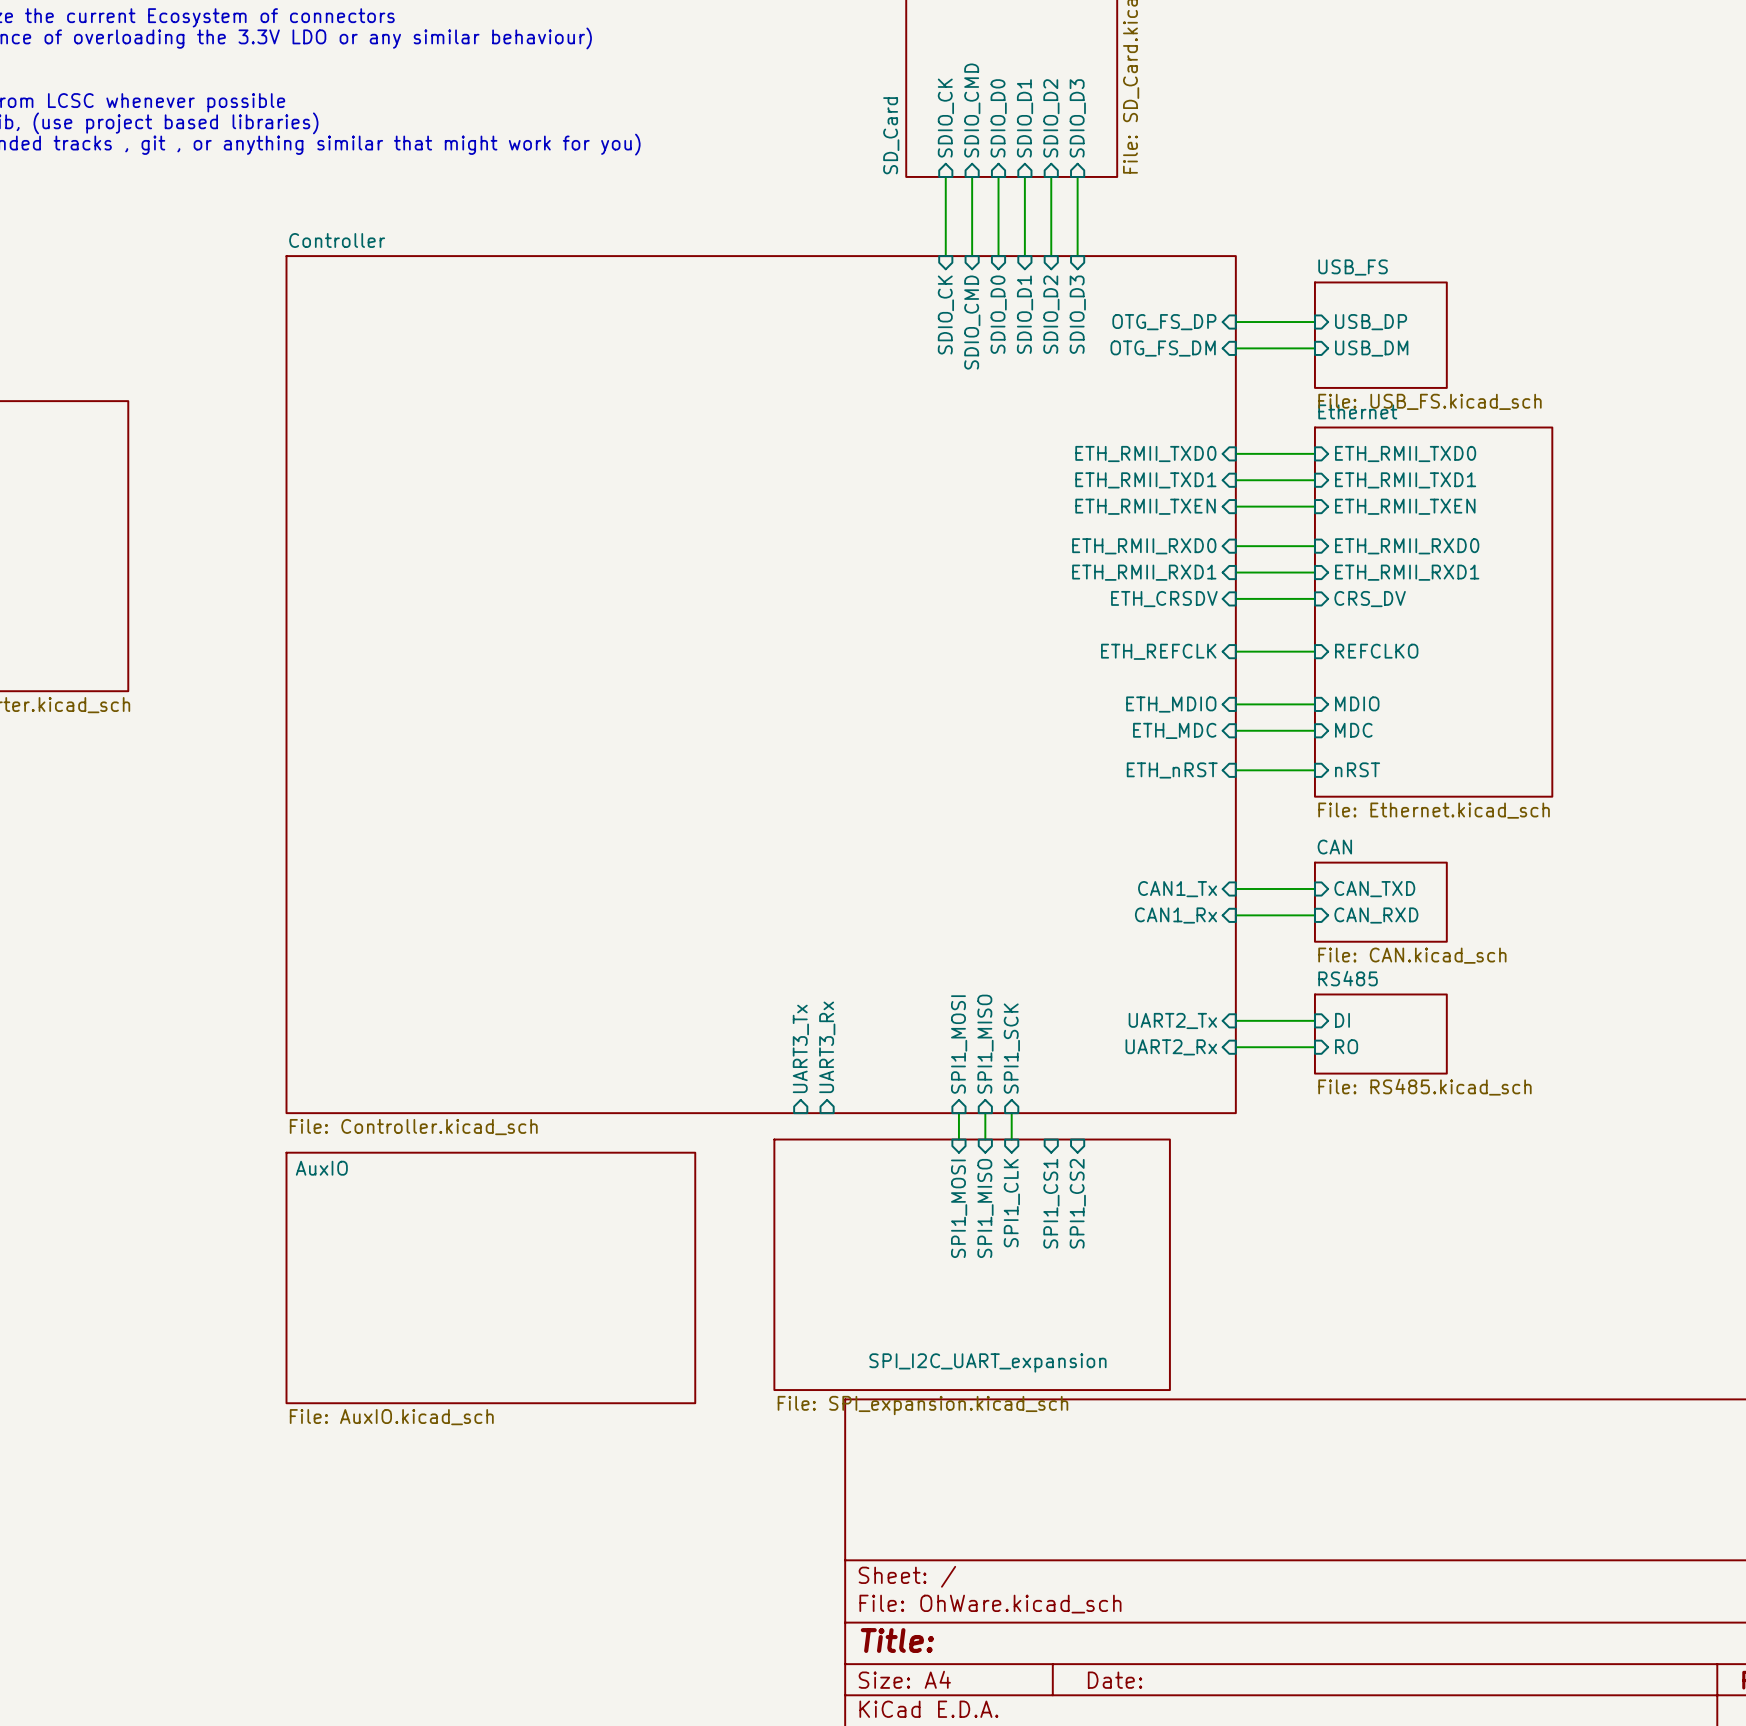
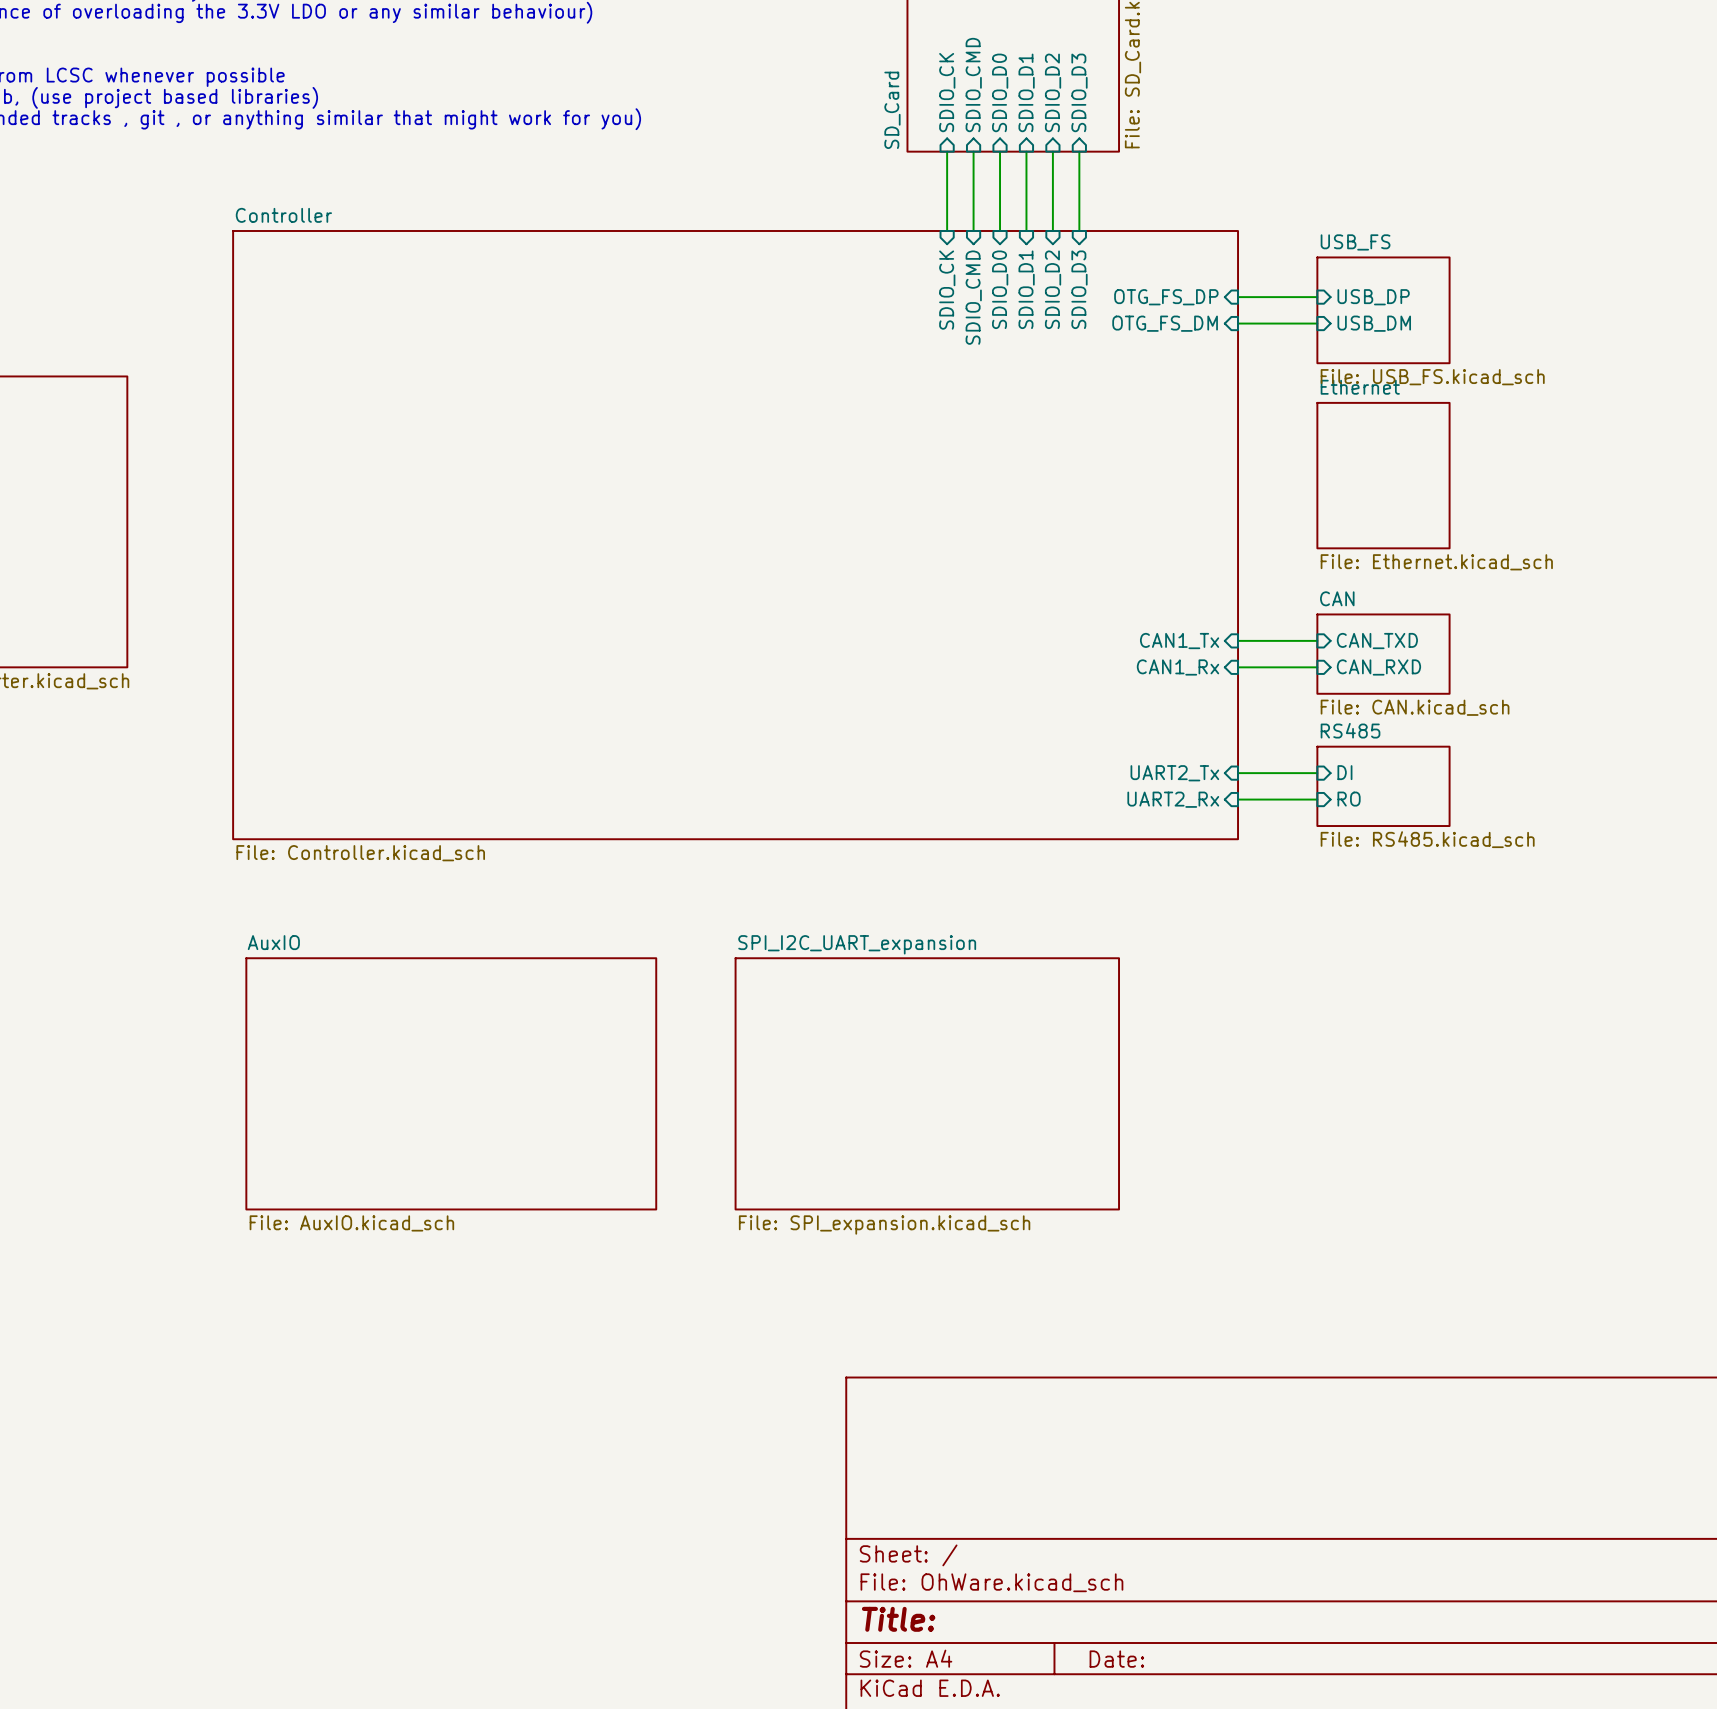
wire: (1235, 453) (1314, 453) -> none
sheet pin: ETH_RMII_TXD0 (1145, 454) -> none
sheet pin: ETH_RMII_TXD0 (1405, 454) -> none
sheet pin: ETH_RMII_TXD1 (1145, 480) -> none
wire: (1235, 480) (1314, 480) -> none
sheet pin: ETH_RMII_TXD1 (1405, 480) -> none
sheet Ethernet: none -> File: Ethernet.kicad_sch (1383, 475)
sheet pin: ETH_RMII_TXEN (1145, 506) -> none
wire: (1235, 506) (1314, 506) -> none
sheet pin: ETH_RMII_TXEN (1405, 506) -> none
sheet pin: ETH_RMII_RXD0 (1144, 546) -> none
wire: (1235, 546) (1314, 546) -> none
sheet pin: ETH_RMII_RXD0 (1407, 546) -> none
sheet Controller: none -> File: Controller.kicad_sch (735, 535)
sheet pin: ETH_RMII_RXD1 (1144, 572) -> none
wire: (1235, 572) (1314, 572) -> (1238, 640) (1317, 640)
sheet pin: ETH_RMII_RXD1 (1407, 572) -> none
wire: (1235, 598) (1314, 598) -> (1238, 667) (1317, 667)
sheet pin: ETH_CRSDV (1164, 599) -> none
sheet pin: CRS_DV (1370, 599) -> none
sheet Ethernet: File: Ethernet.kicad_sch (1433, 612) -> none
sheet pin: ETH_REFCLK (1158, 651) -> none
wire: (1235, 651) (1314, 651) -> none
sheet pin: REFCLKO (1376, 651) -> none
sheet Controller: File: Controller.kicad_sch (761, 684) -> none
sheet pin: MDIO (1357, 703) -> none
sheet pin: ETH_MDIO (1171, 704) -> none
wire: (1235, 704) (1314, 704) -> (1238, 773) (1317, 773)
sheet pin: ETH_MDC (1174, 730) -> none
wire: (1235, 730) (1314, 730) -> (1238, 799) (1317, 799)
sheet pin: MDC (1353, 730) -> none
sheet pin: nRST (1357, 769) -> none
sheet pin: ETH_nRST (1172, 770) -> none
wire: (1235, 770) (1314, 770) -> none
wire: (1235, 888) (1314, 888) -> none
sheet pin position: CAN1_Tx (1177, 889) -> CAN1_Tx (1179, 641)
sheet pin position: CAN_TXD (1374, 889) -> CAN_TXD (1377, 641)
sheet CAN position: (1380, 902) -> (1383, 654)
sheet pin position: CAN1_Rx (1176, 915) -> CAN1_Rx (1178, 667)
wire: (1235, 915) (1314, 915) -> none
sheet pin position: CAN_RXD (1376, 915) -> CAN_RXD (1378, 667)
sheet pin position: UART2_Tx (1172, 1020) -> UART2_Tx (1174, 773)
wire: (1235, 1020) (1314, 1020) -> none
sheet pin position: DI (1342, 1020) -> DI (1344, 772)
sheet RS485 position: (1380, 1034) -> (1383, 786)
sheet pin: SPI1_MOSI (959, 1044) -> none
sheet pin: SPI1_MISO (985, 1044) -> none
sheet pin position: RO (1346, 1046) -> RO (1349, 799)
sheet pin: UART3_Rx (827, 1047) -> none
sheet pin position: UART2_Rx (1171, 1047) -> UART2_Rx (1173, 799)
wire: (1235, 1047) (1314, 1047) -> none
sheet pin: UART3_Tx (800, 1048) -> none
sheet pin: SPI1_SCK (1011, 1048) -> none
wire: (958, 1113) (958, 1139) -> none
wire: (985, 1113) (985, 1139) -> none
wire: (1011, 1113) (1011, 1139) -> none
sheet SPI_I2C_UART_expansion shape: [773, 1138, 1171, 1391] -> [734, 957, 1120, 1211]
sheet AuxIO name position: AuxIO (321, 1168) -> AuxIO (273, 942)
sheet pin: SPI1_CLK (1011, 1203) -> none
sheet pin: SPI1_CS1 (1051, 1203) -> none
sheet pin: SPI1_CS2 (1077, 1203) -> none
sheet pin: SPI1_MOSI (959, 1208) -> none
sheet pin: SPI1_MISO (985, 1208) -> none
sheet AuxIO position: (490, 1277) -> (451, 1083)
sheet SPI_I2C_UART_expansion name position: SPI_I2C_UART_expansion (987, 1362) -> SPI_I2C_UART_expansion (857, 944)

